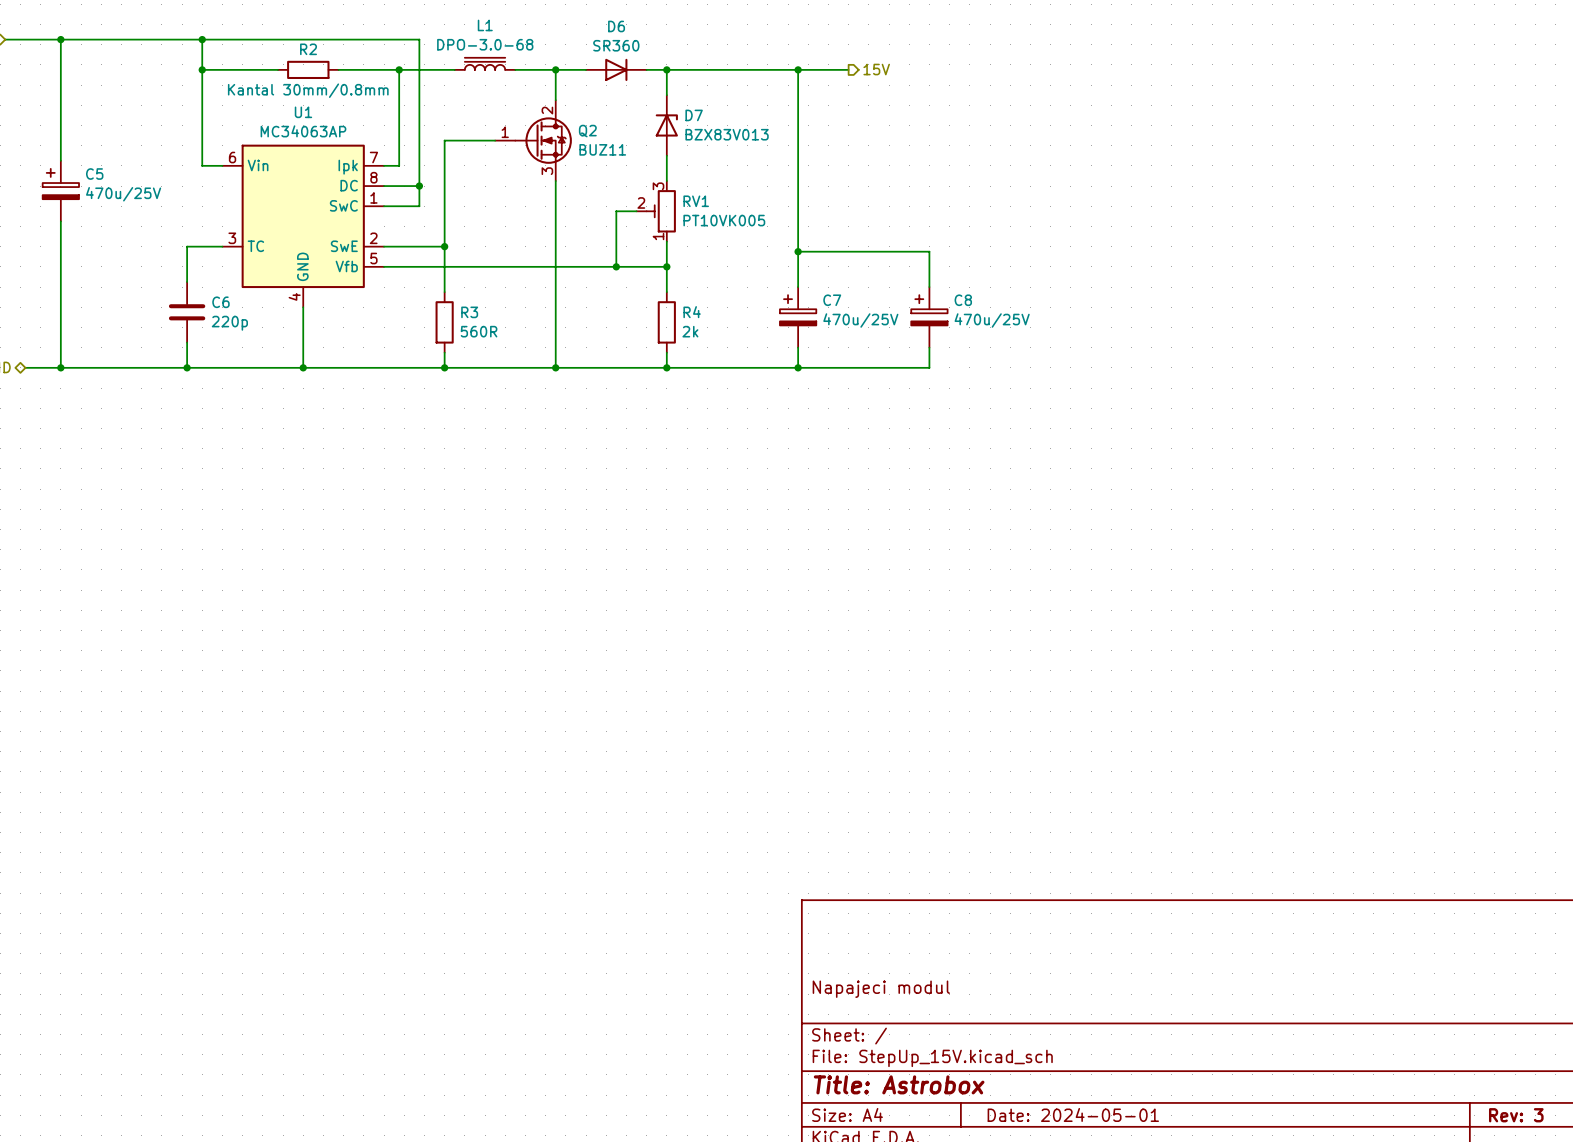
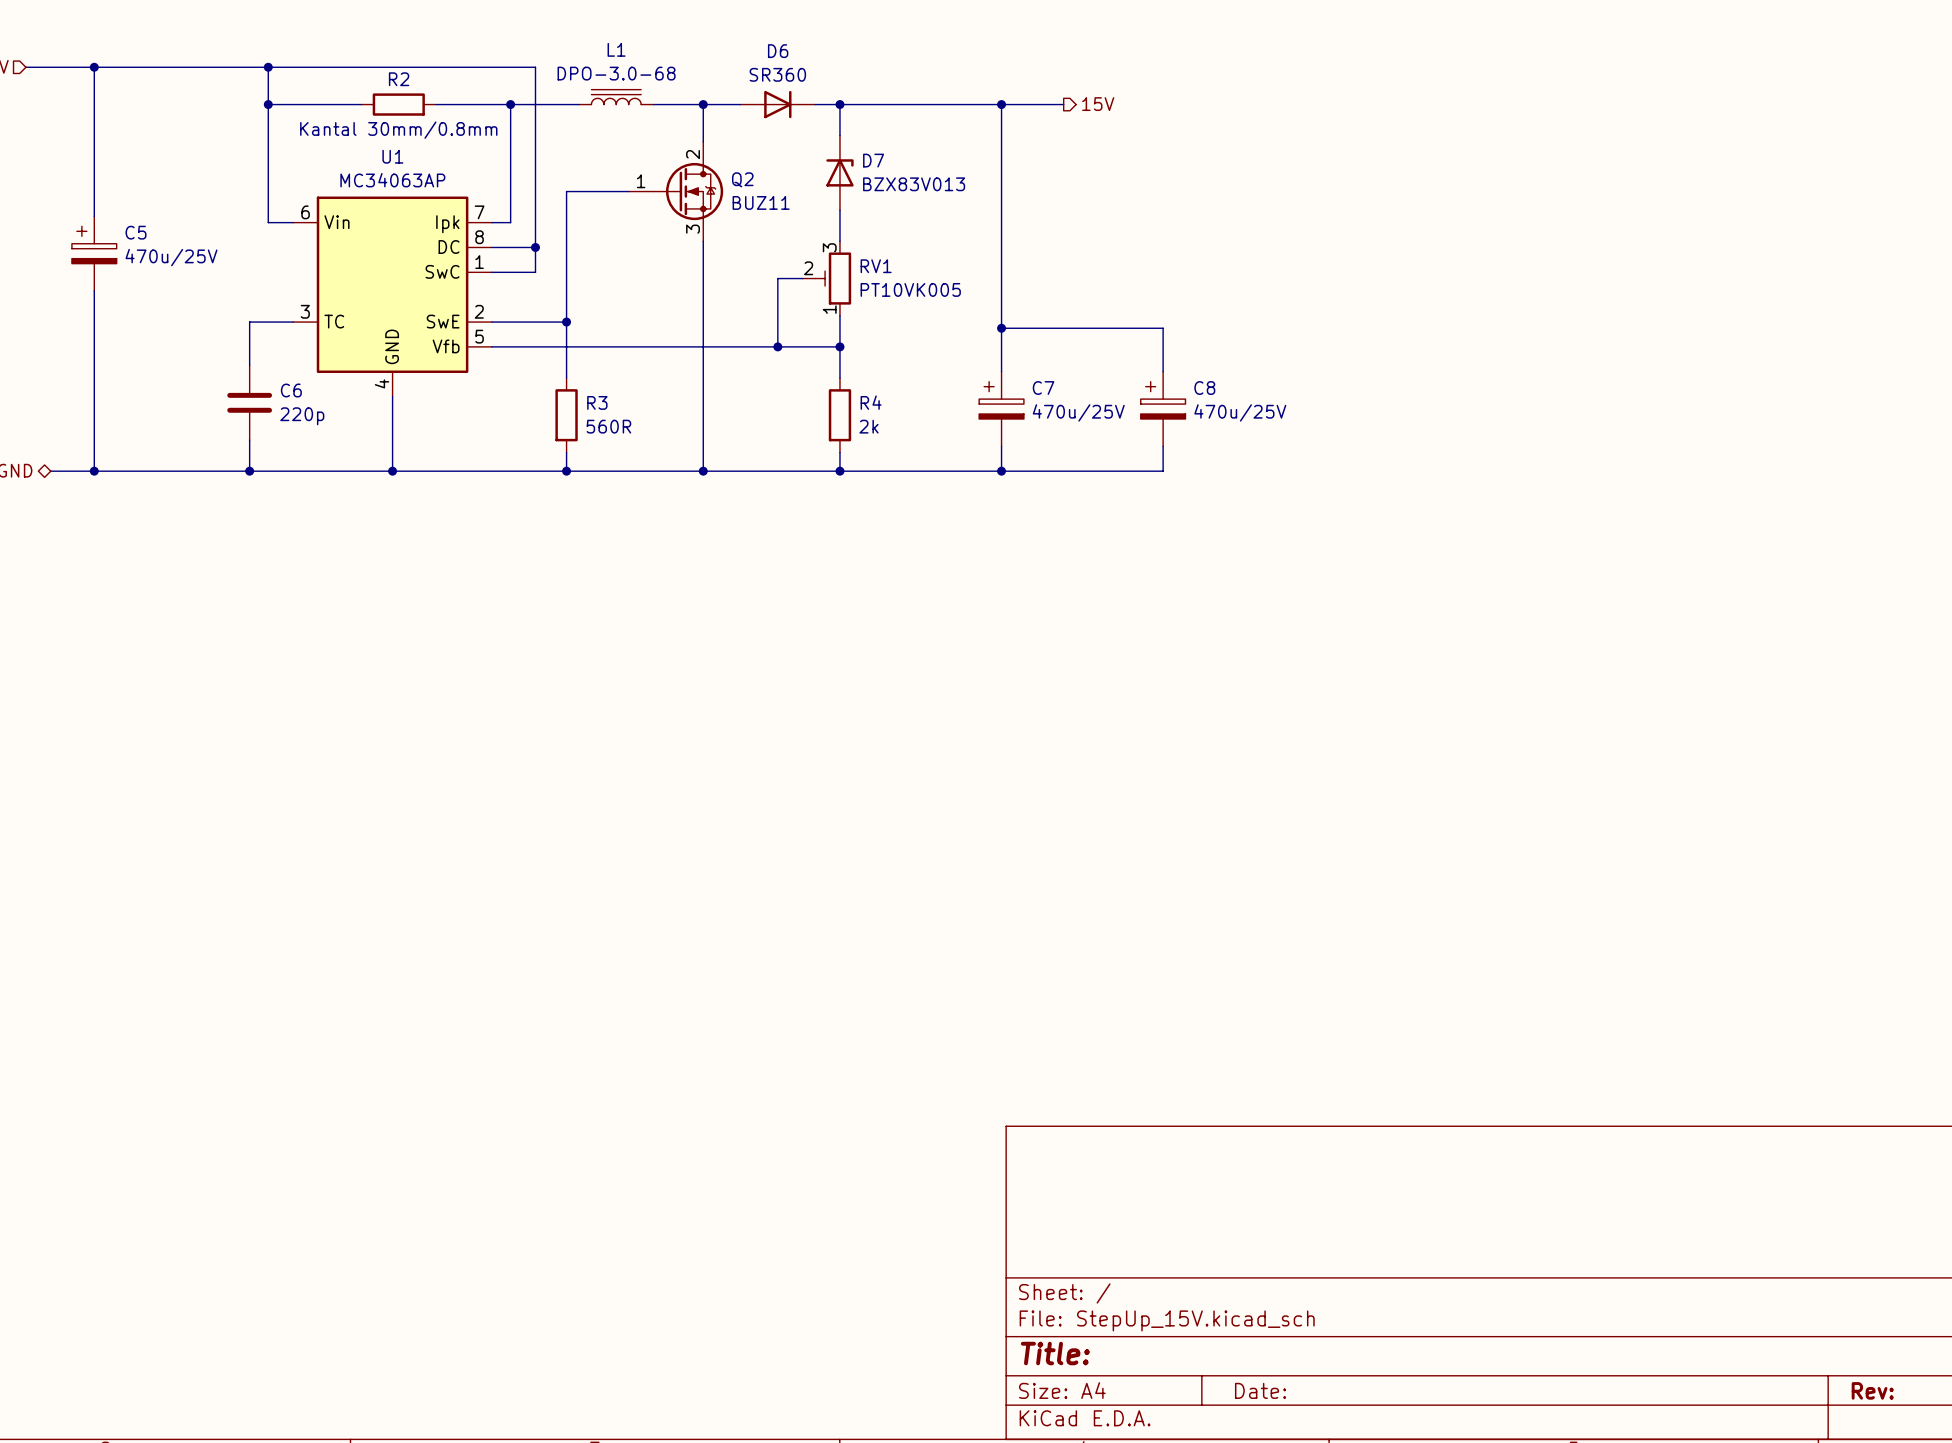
title block: Napajeci modul (881, 989) -> none
title block: Title: Astrobox (899, 1084) -> Title: (1055, 1353)
title block: Date: 2024-05-01 (1073, 1114) -> Date: (1260, 1390)
title block: Rev: 3 (1516, 1115) -> Rev: (1872, 1390)

